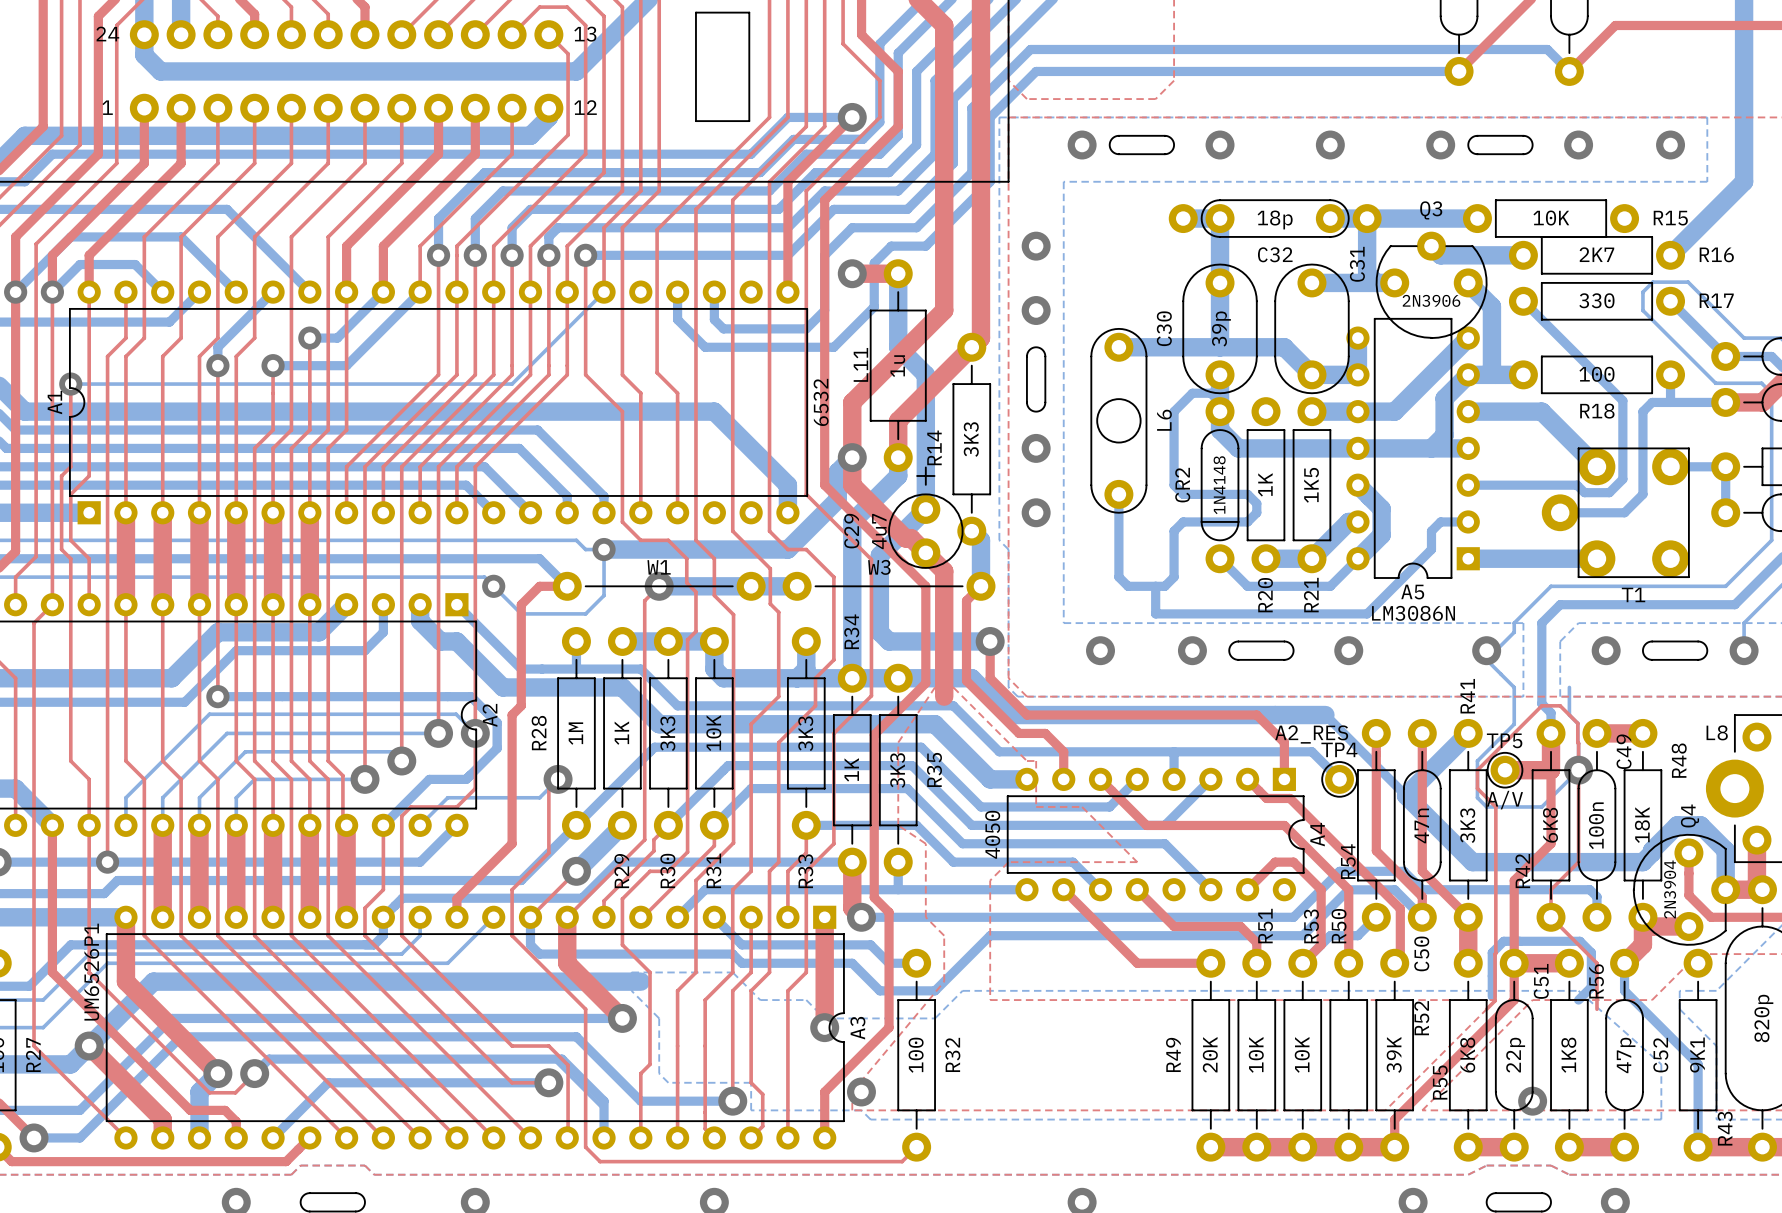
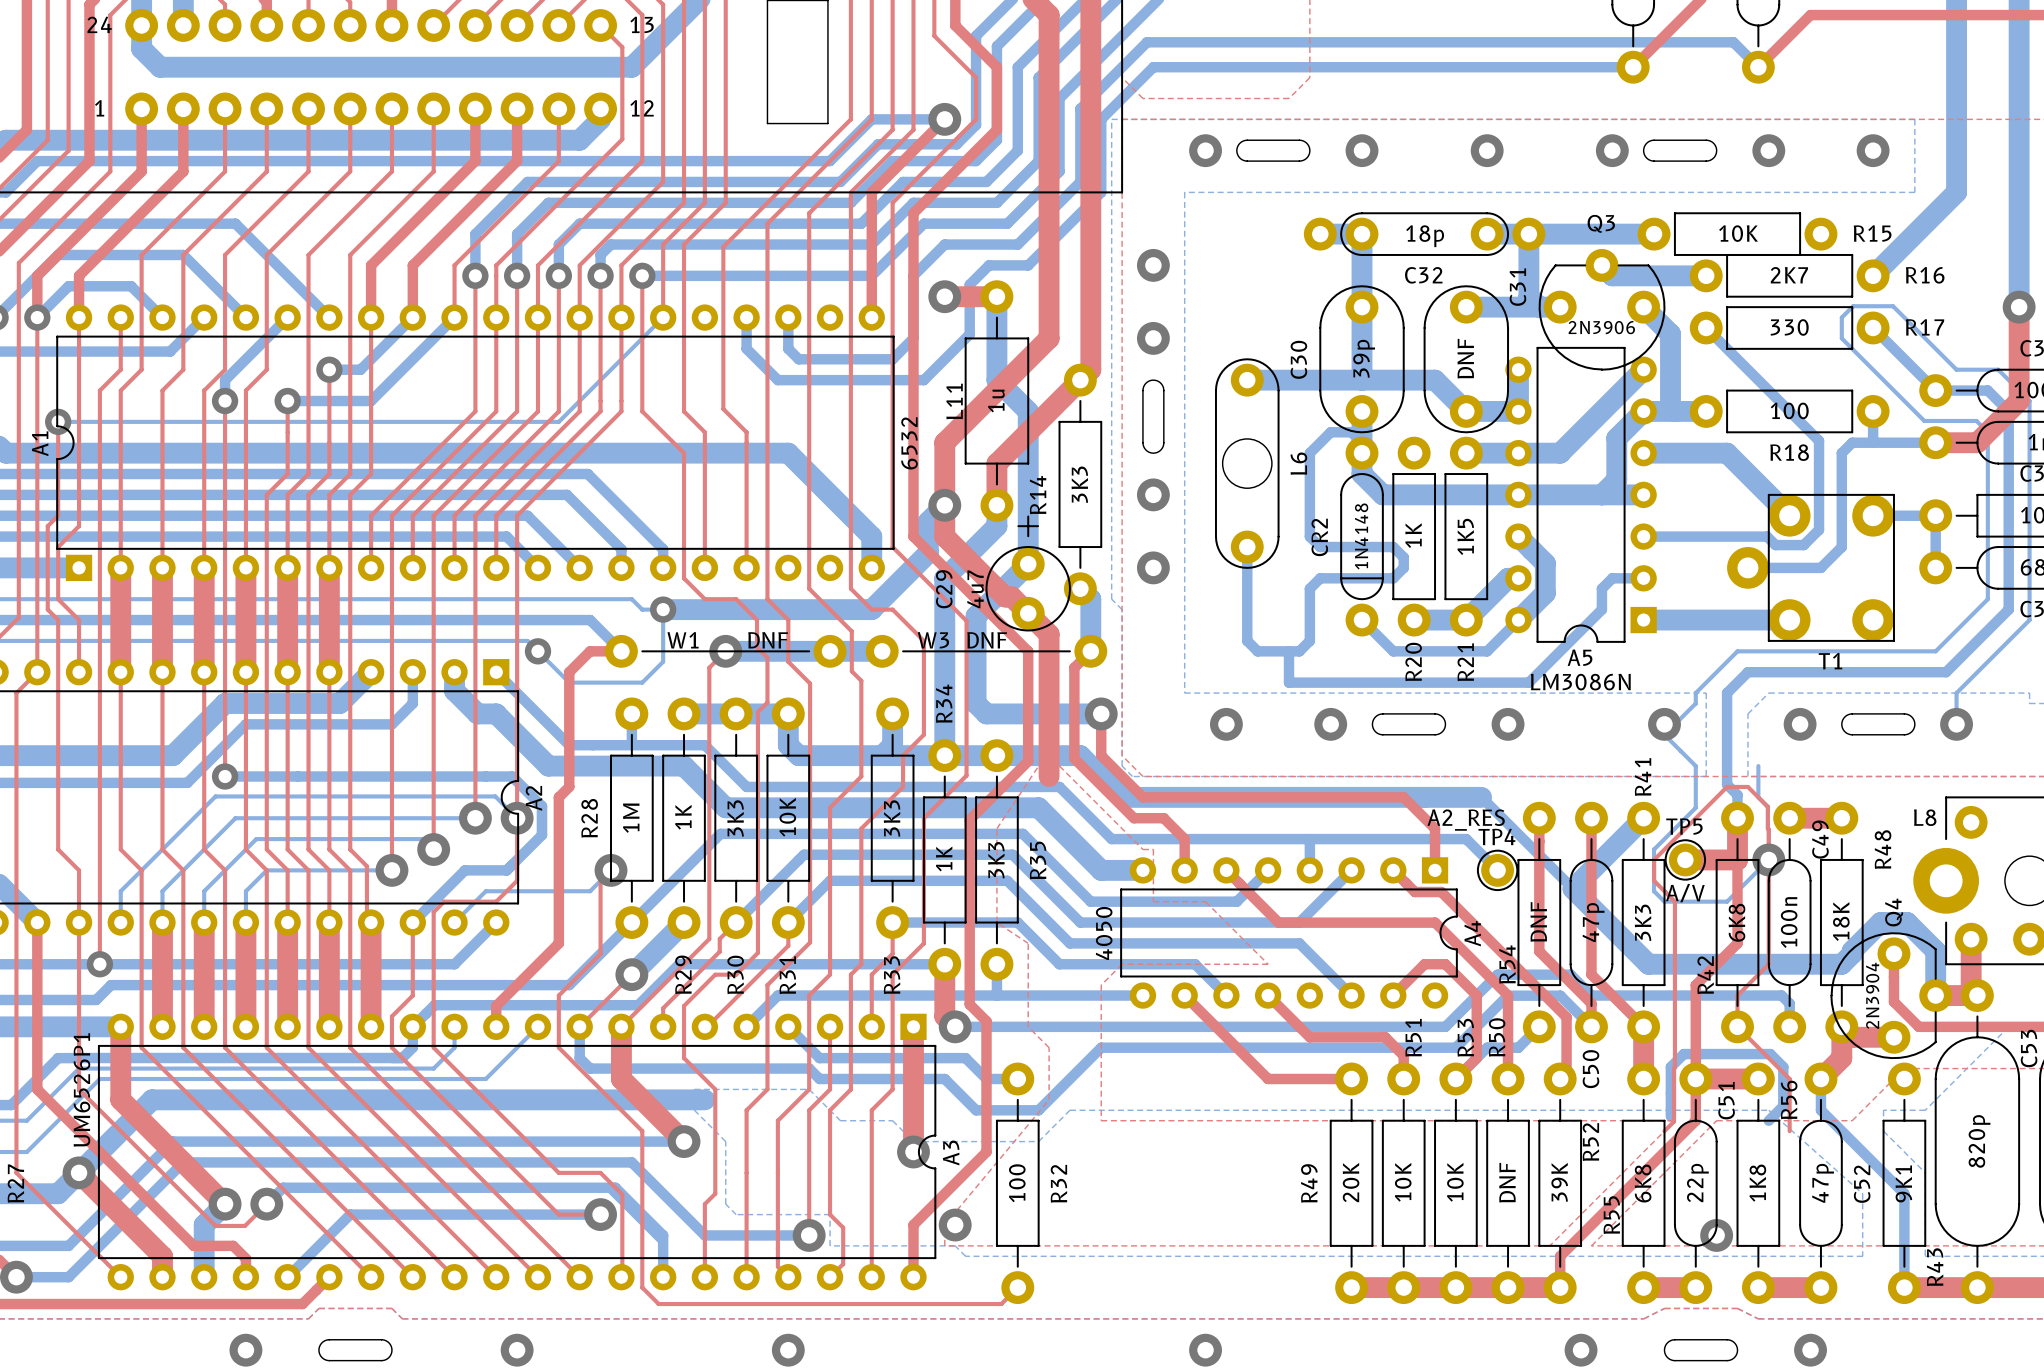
C31 value: none -> DNF (1465, 358)
W1 name position: W1 (659, 567) -> W1 (683, 640)
W3 name position: W3 (879, 567) -> W3 (933, 640)
W1 value: none -> DNF (768, 640)
W3 value: none -> DNF (987, 640)
R54 value: none -> DNF (1538, 921)
C50 value: 47n (1421, 825) -> 47p (1593, 922)
R50 value: none -> DNF (1507, 1182)

